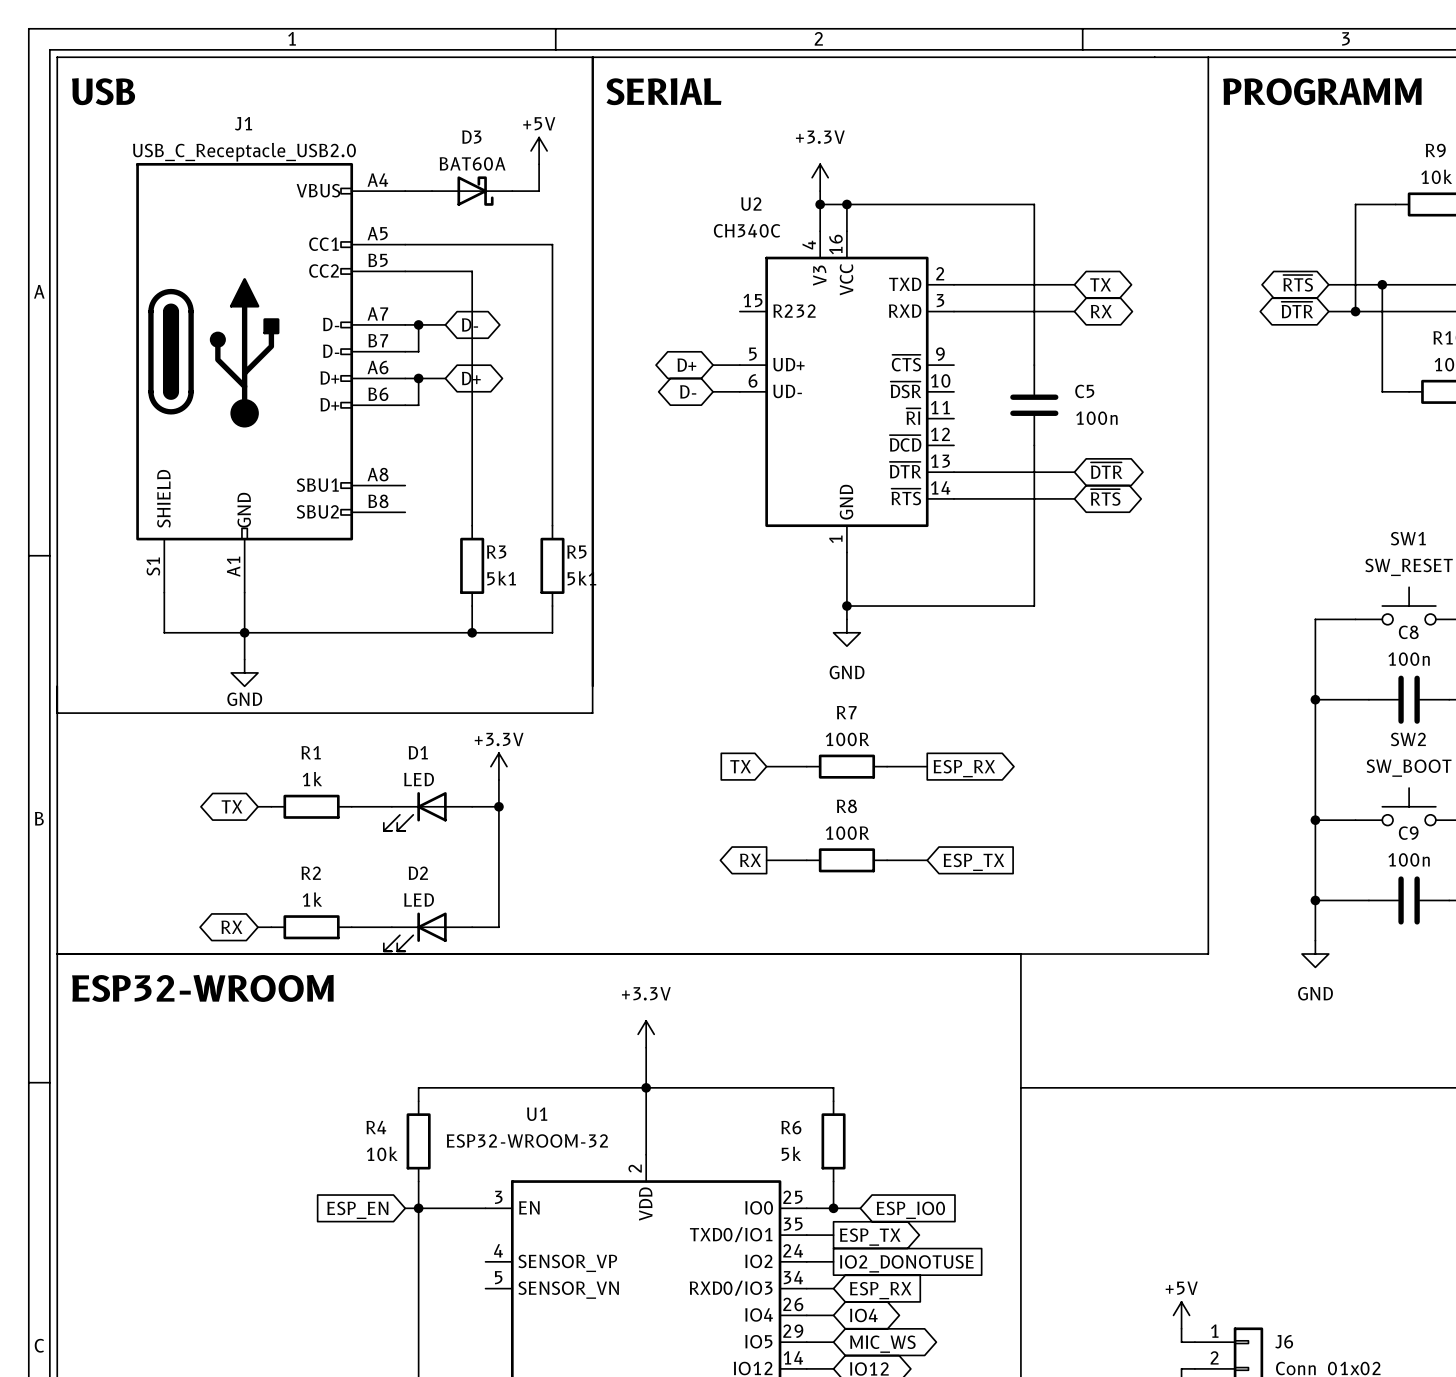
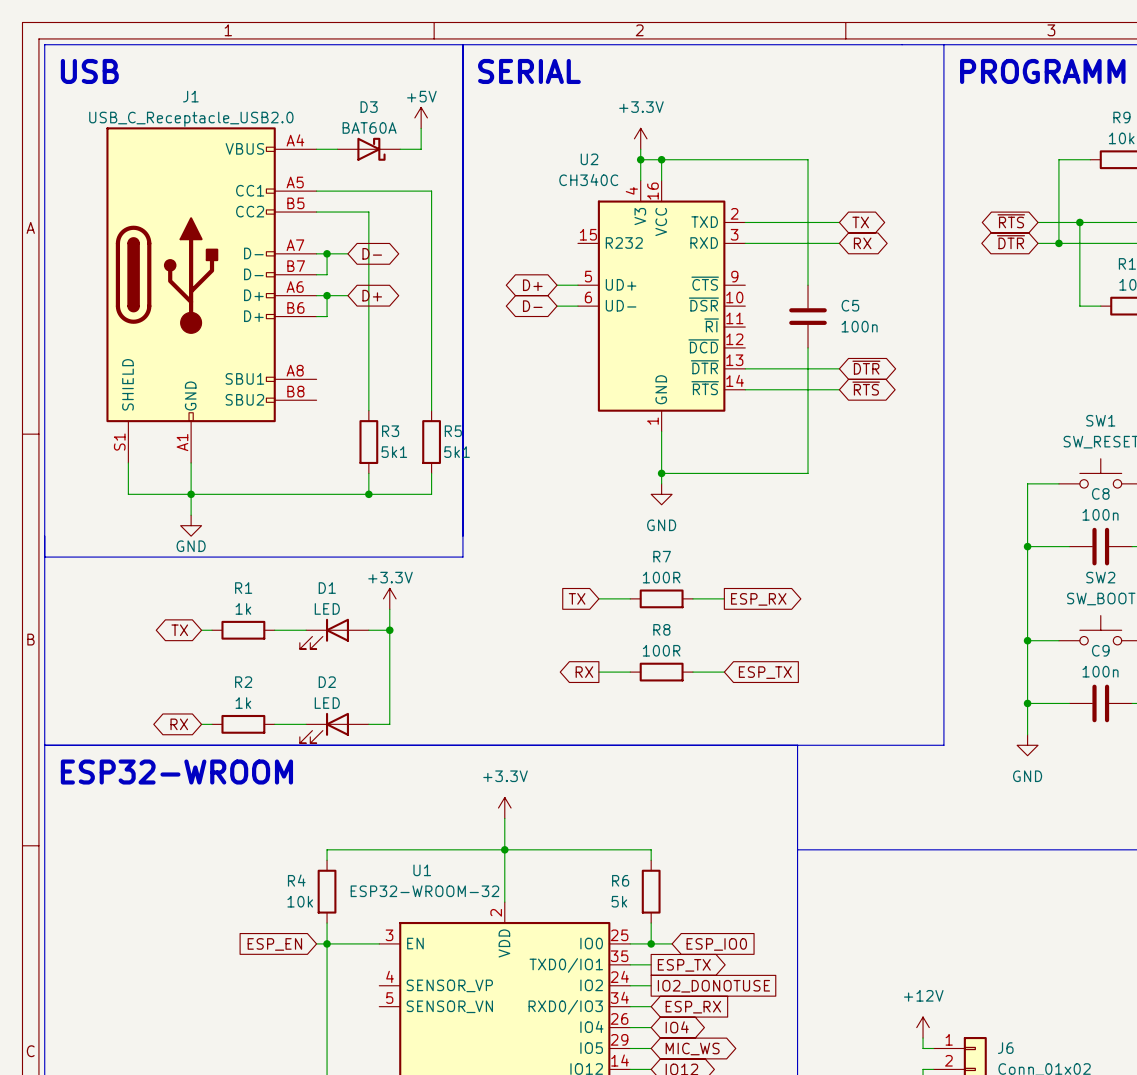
power symbol: +5V (1181, 1315) -> +12V (923, 1027)

